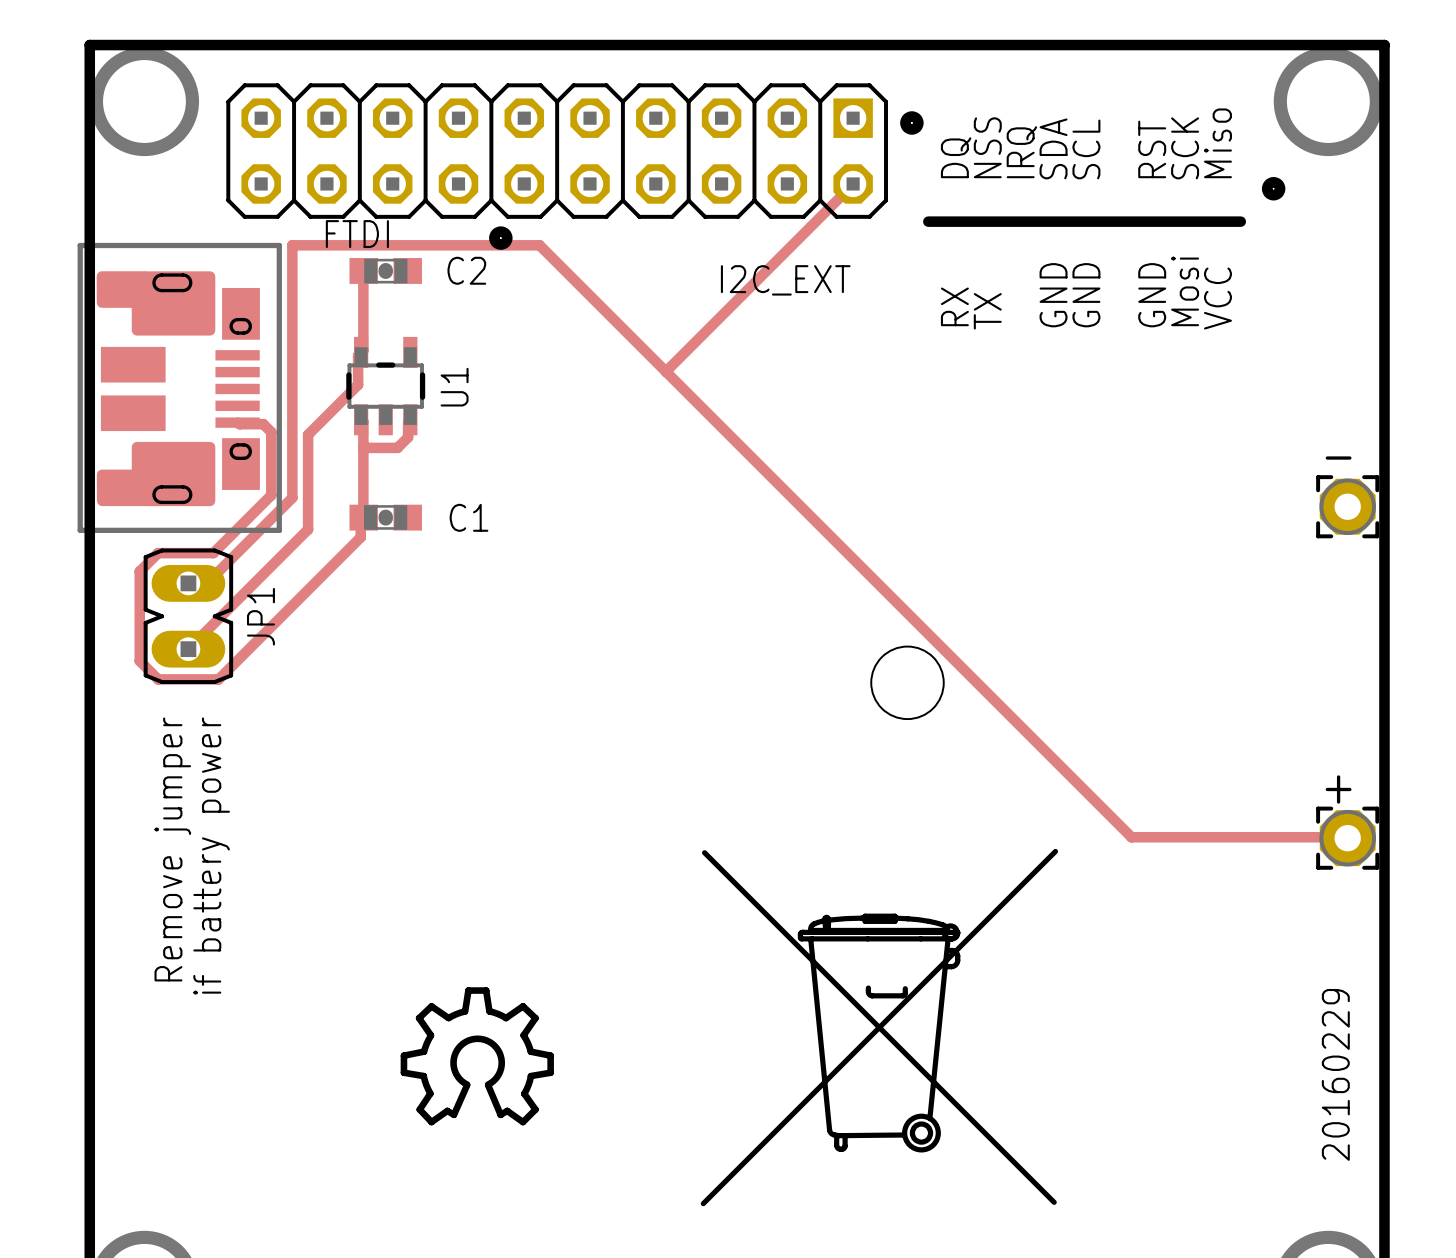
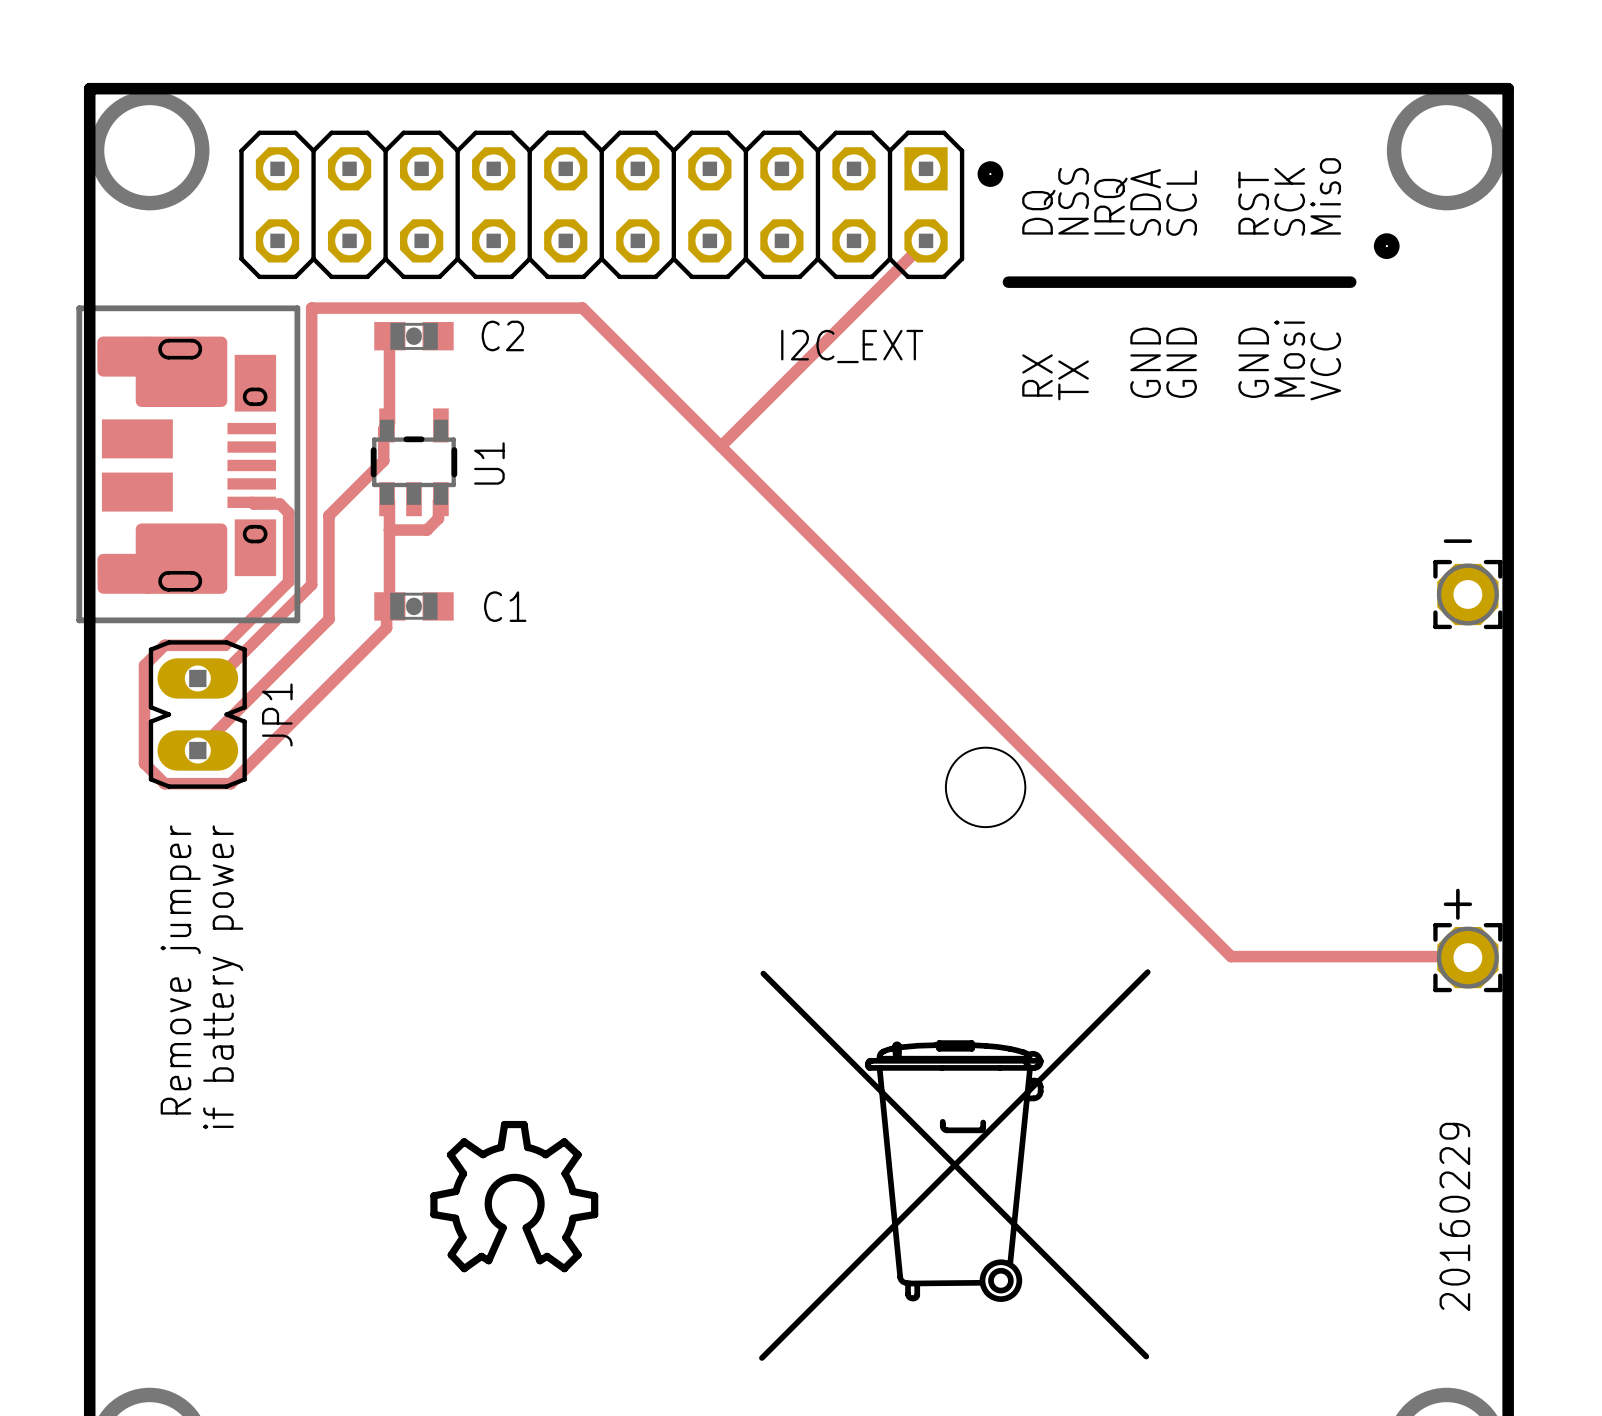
drawing: [489, 226, 513, 250] -> none
text: FTDI (357, 234) -> none

